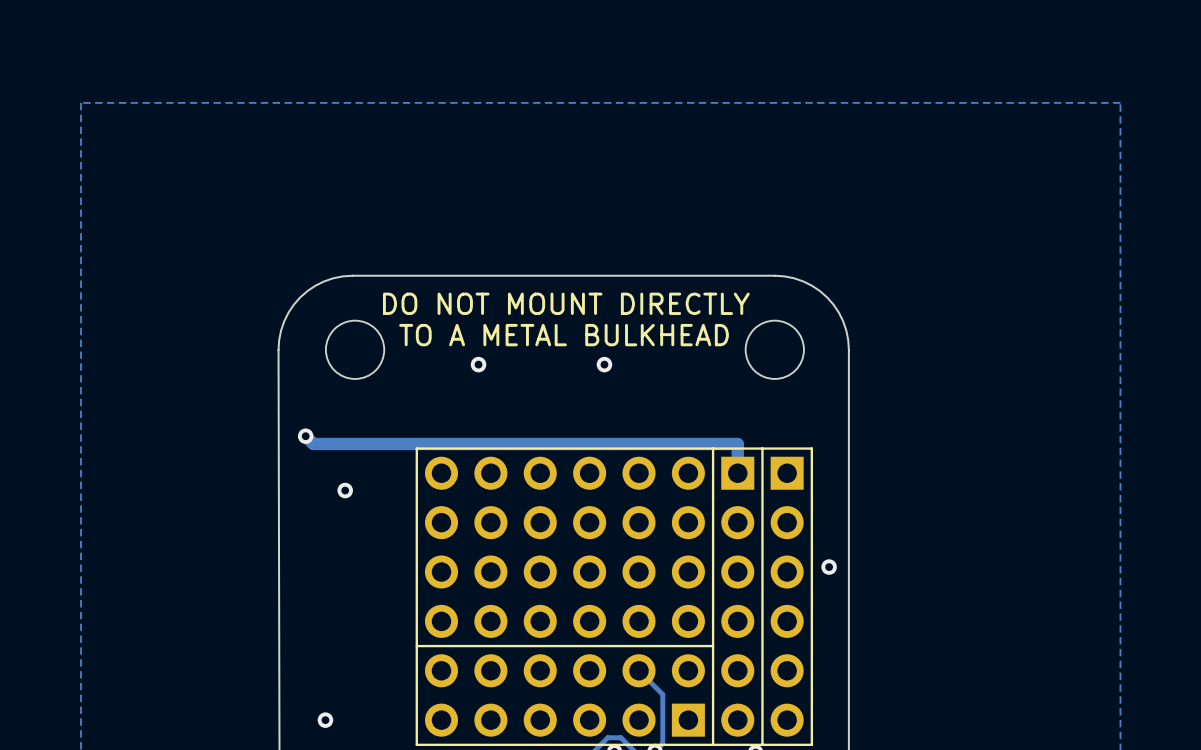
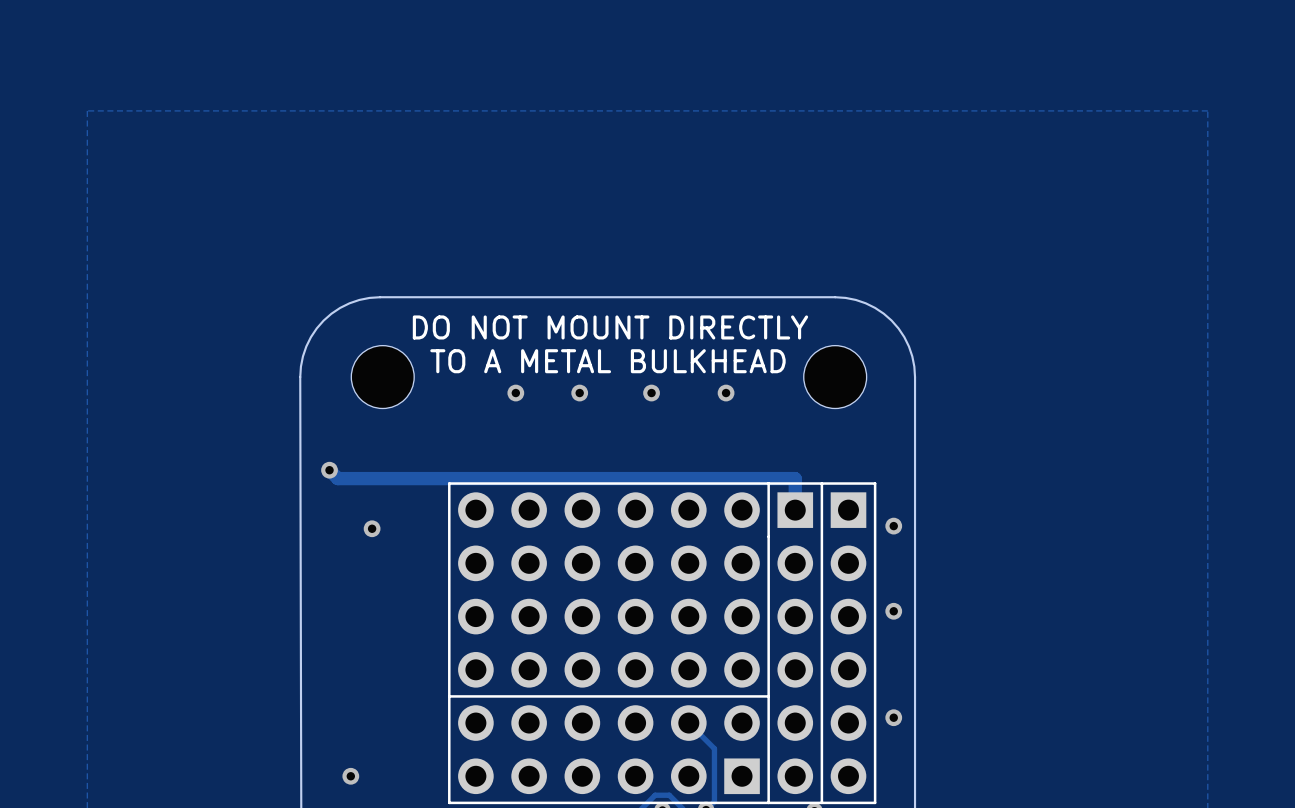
via: none -> (579, 393)
via: none -> (726, 393)
via: none -> (893, 526)
via: none -> (893, 717)

